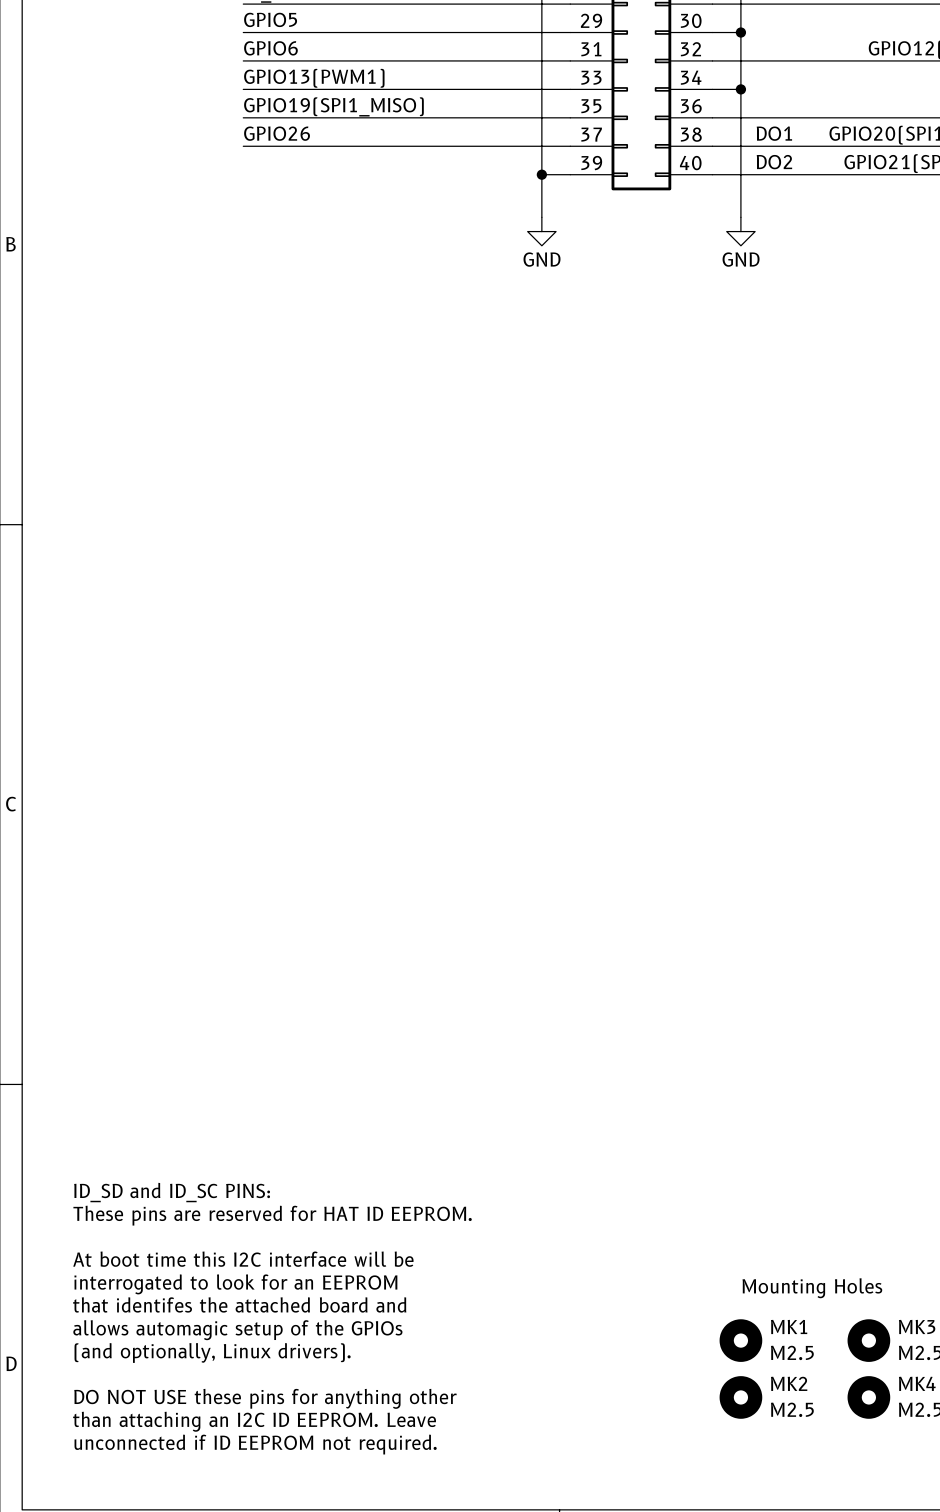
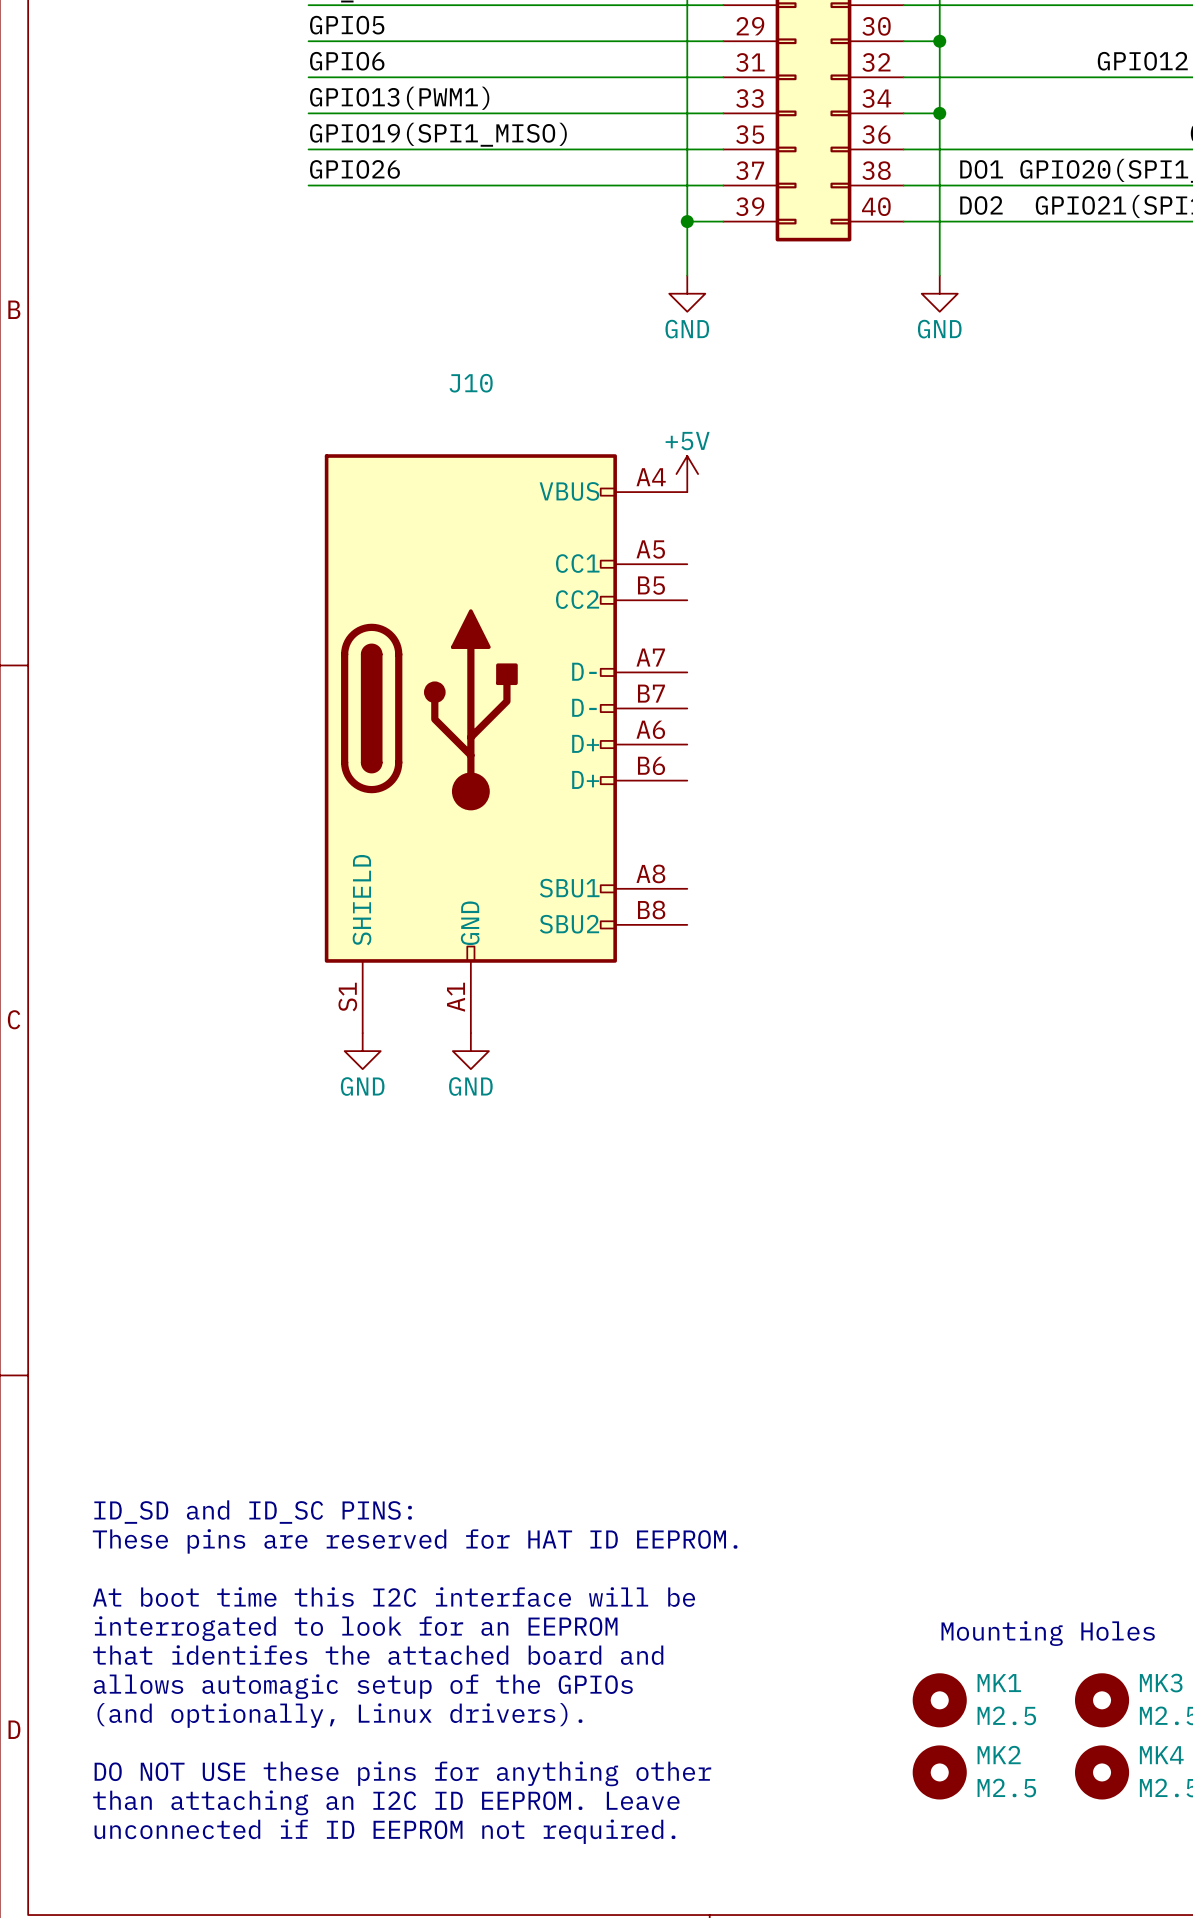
power symbol: none -> +5V (687, 474)
J10: none -> (506, 743)
power symbol: none -> GND (362, 1051)
power symbol: none -> GND (470, 1051)

